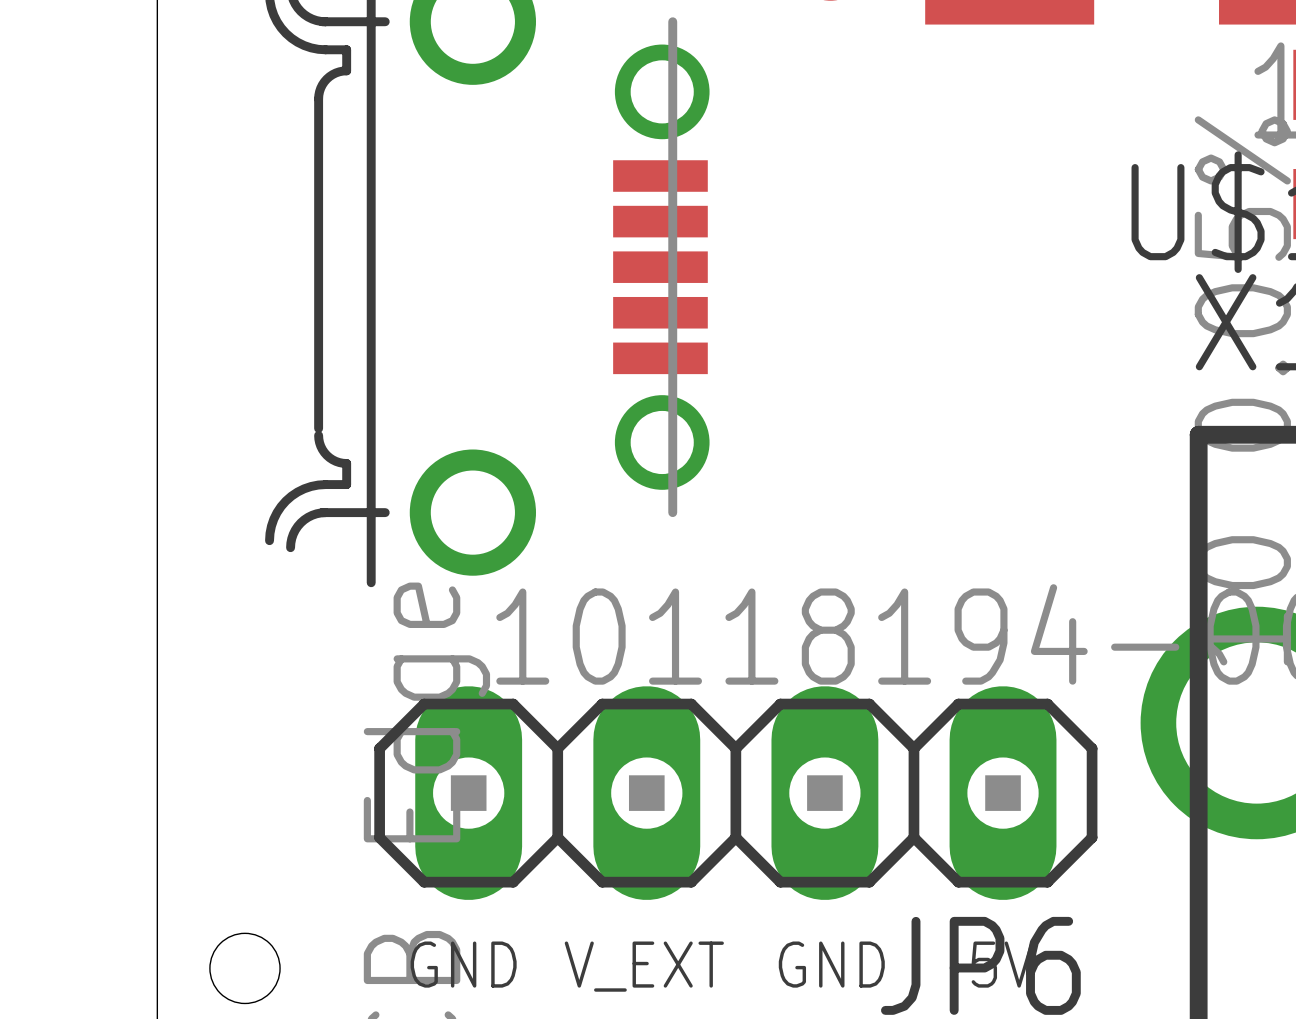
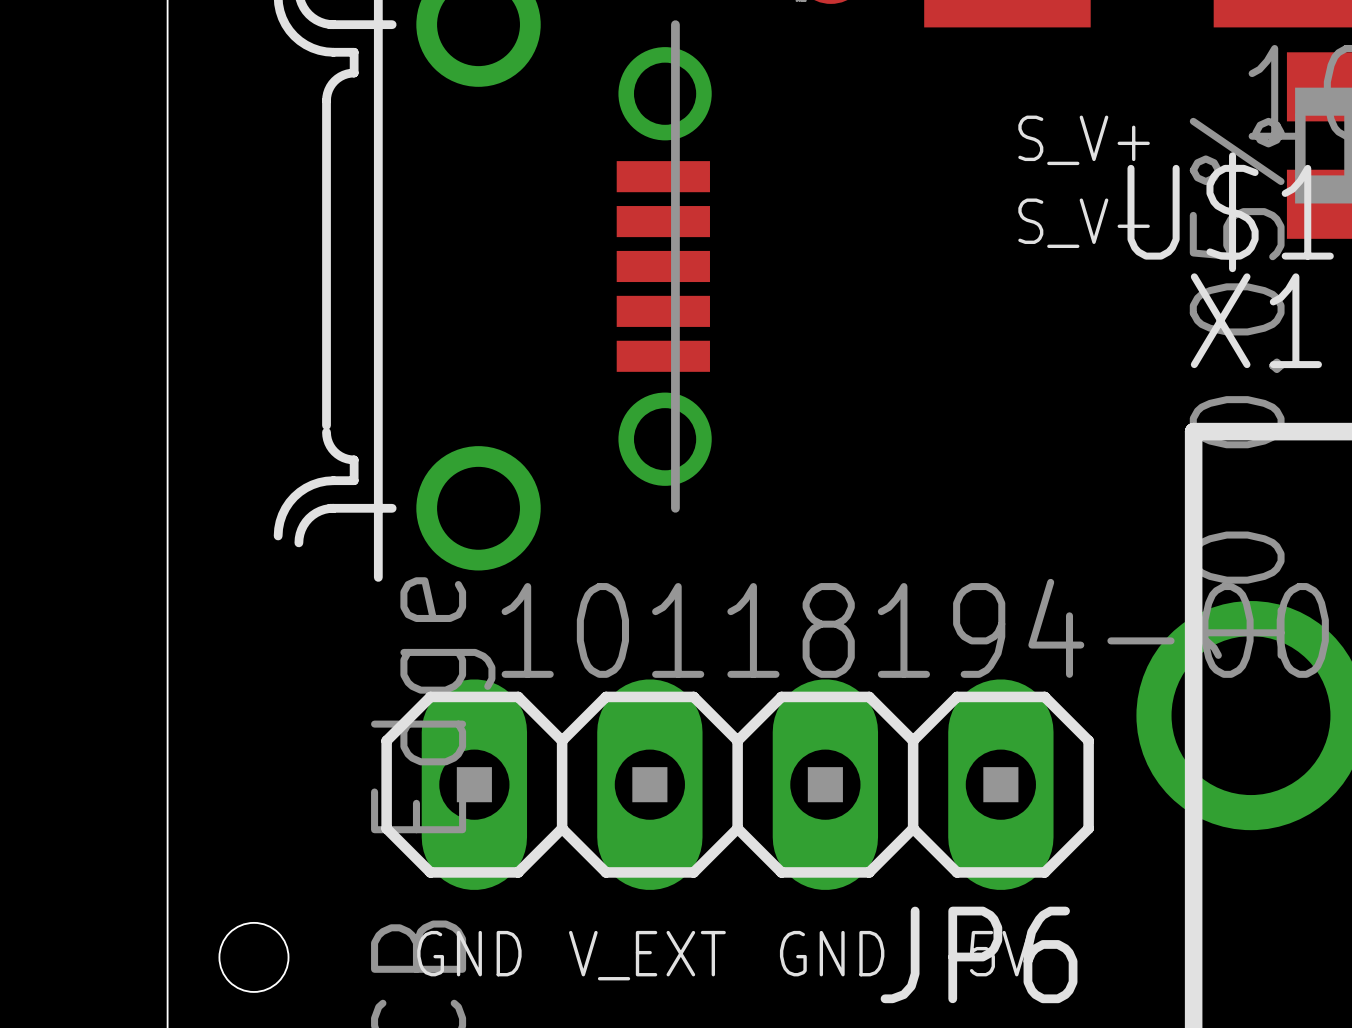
text: none -> S_V+ (1084, 140)
text: none -> S_V- (1084, 223)

